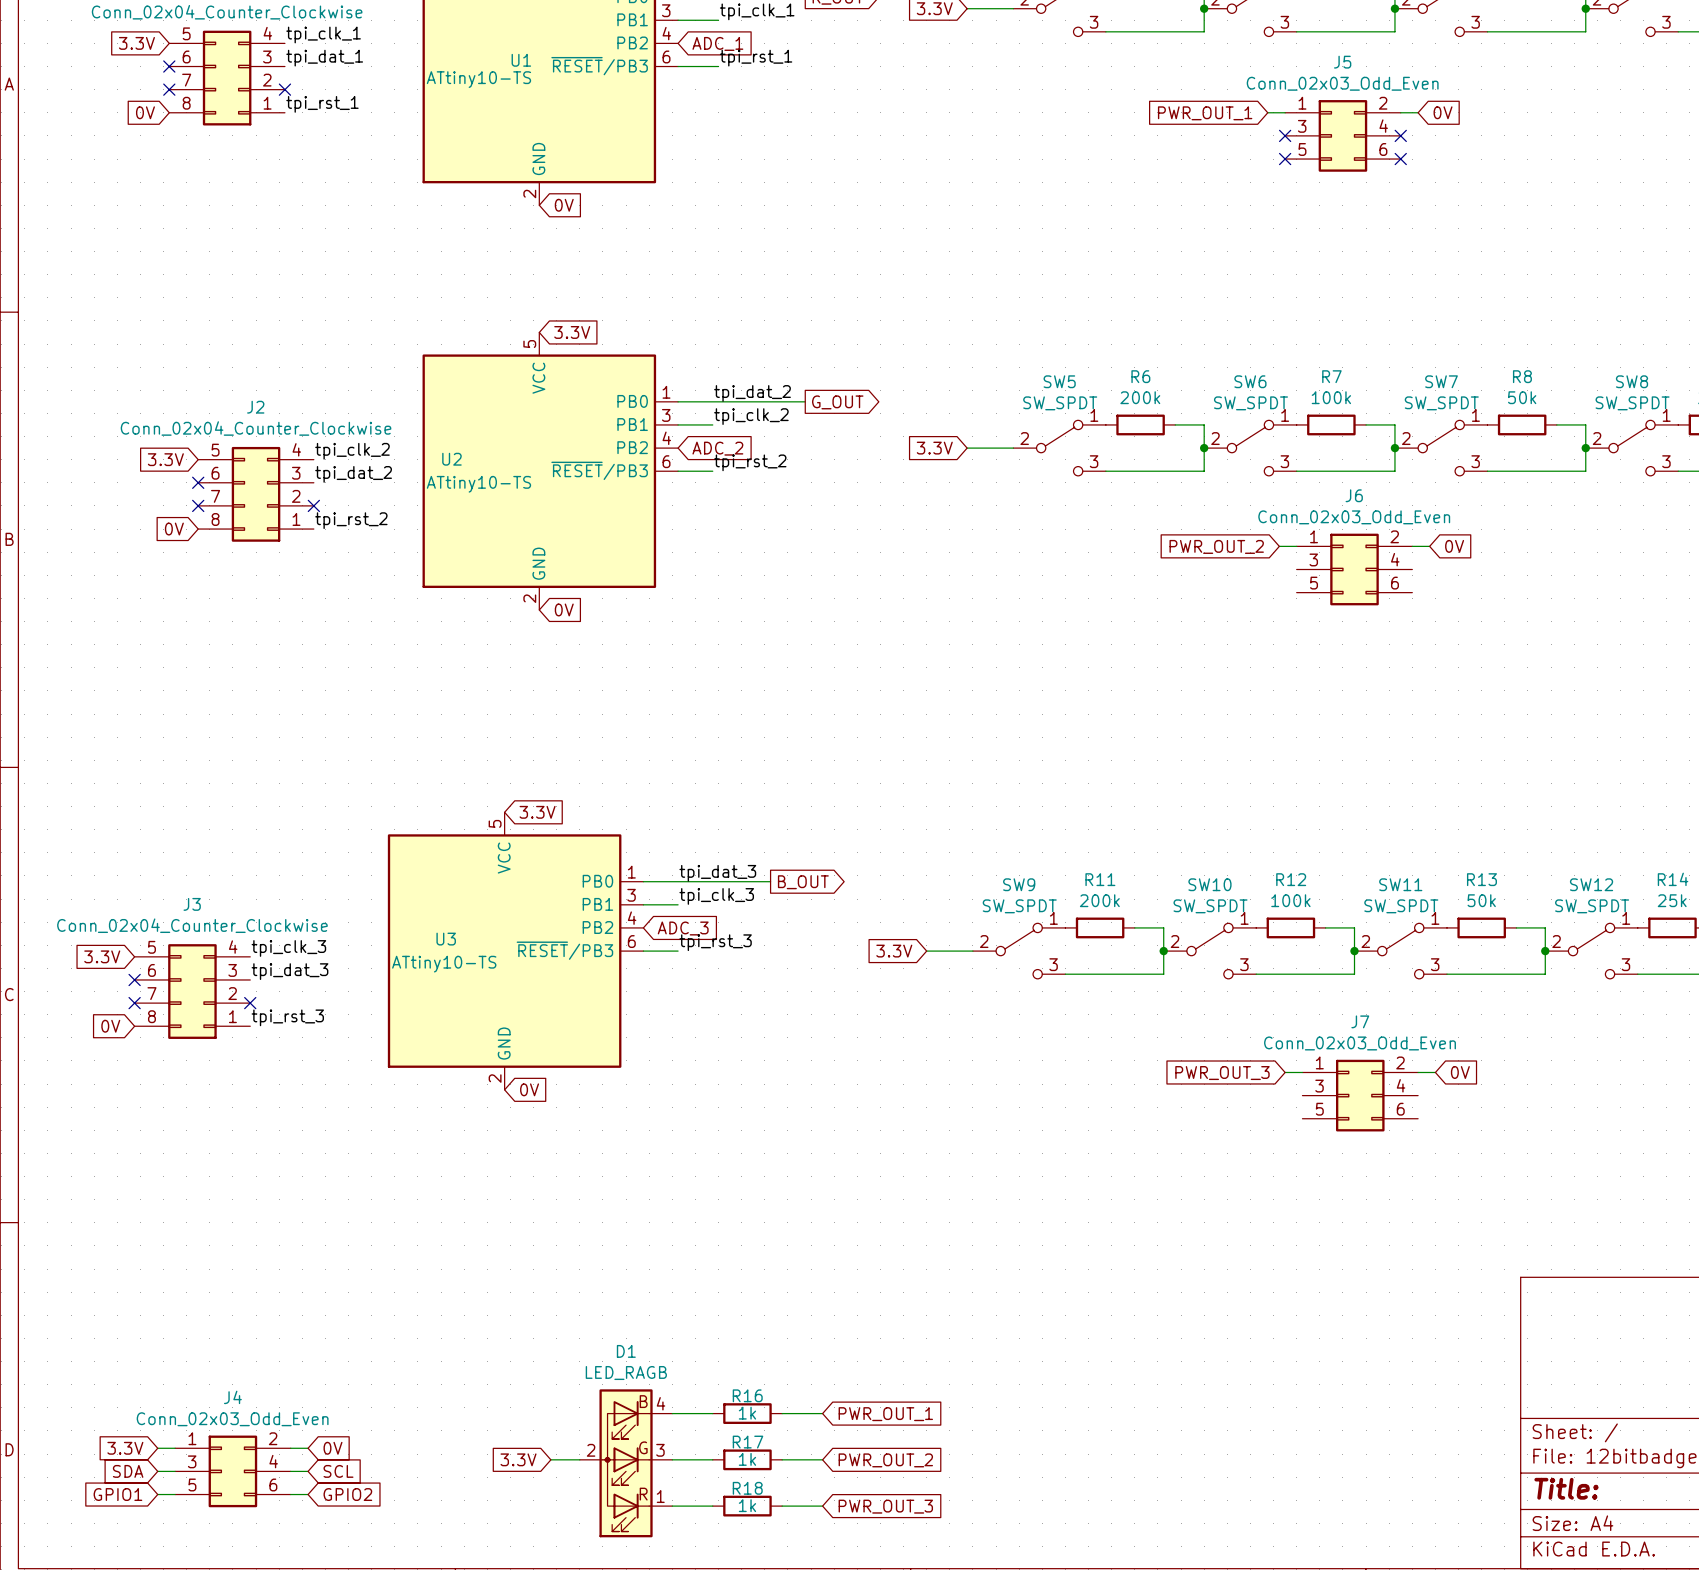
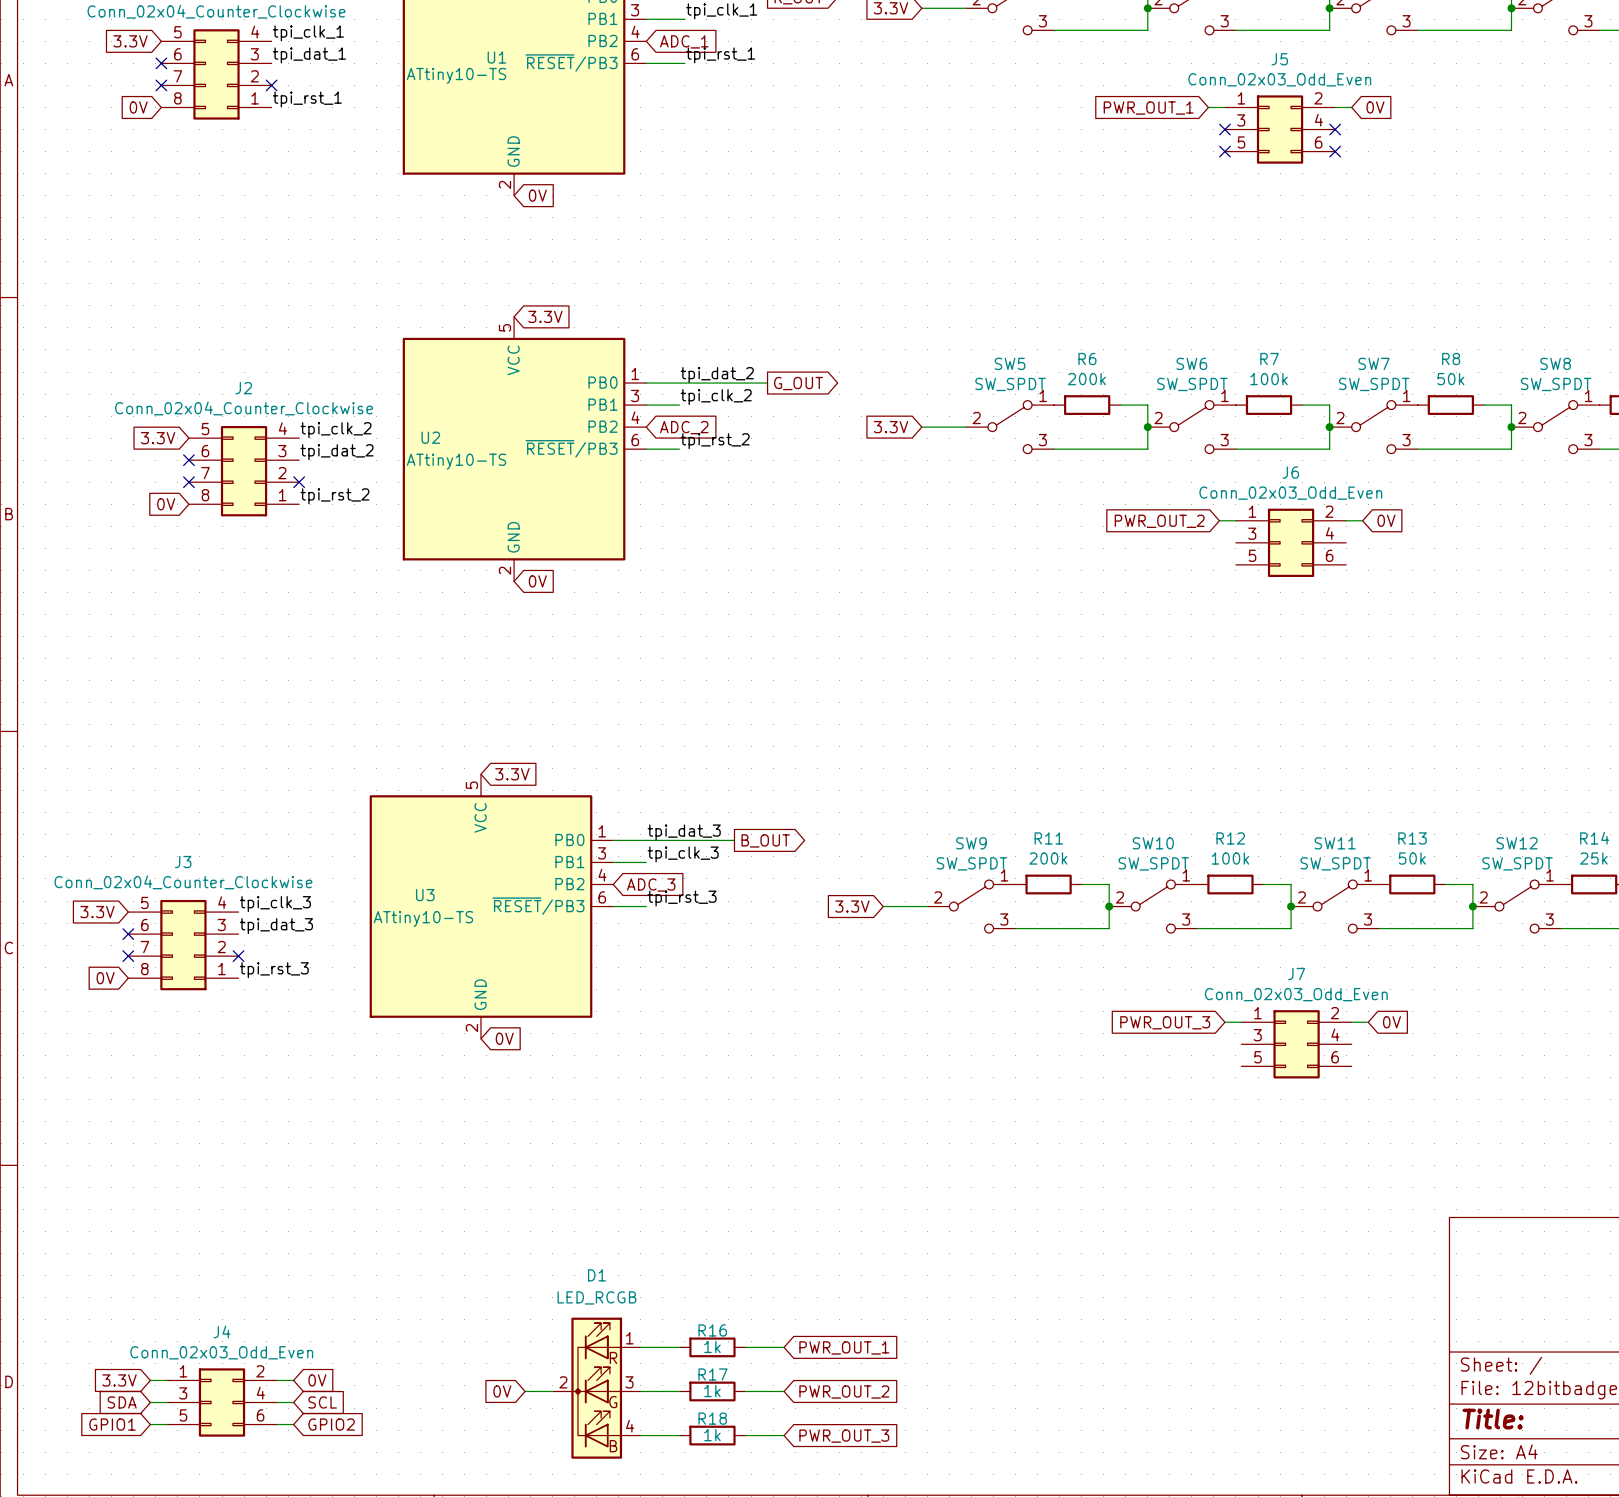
D1 value: LED_RAGB (626, 1373) -> LED_RCGB (596, 1297)
D1 symbol: [579, 1389, 673, 1538] -> [552, 1317, 641, 1459]
global label: 3.3V (518, 1459) -> 0V (502, 1391)

